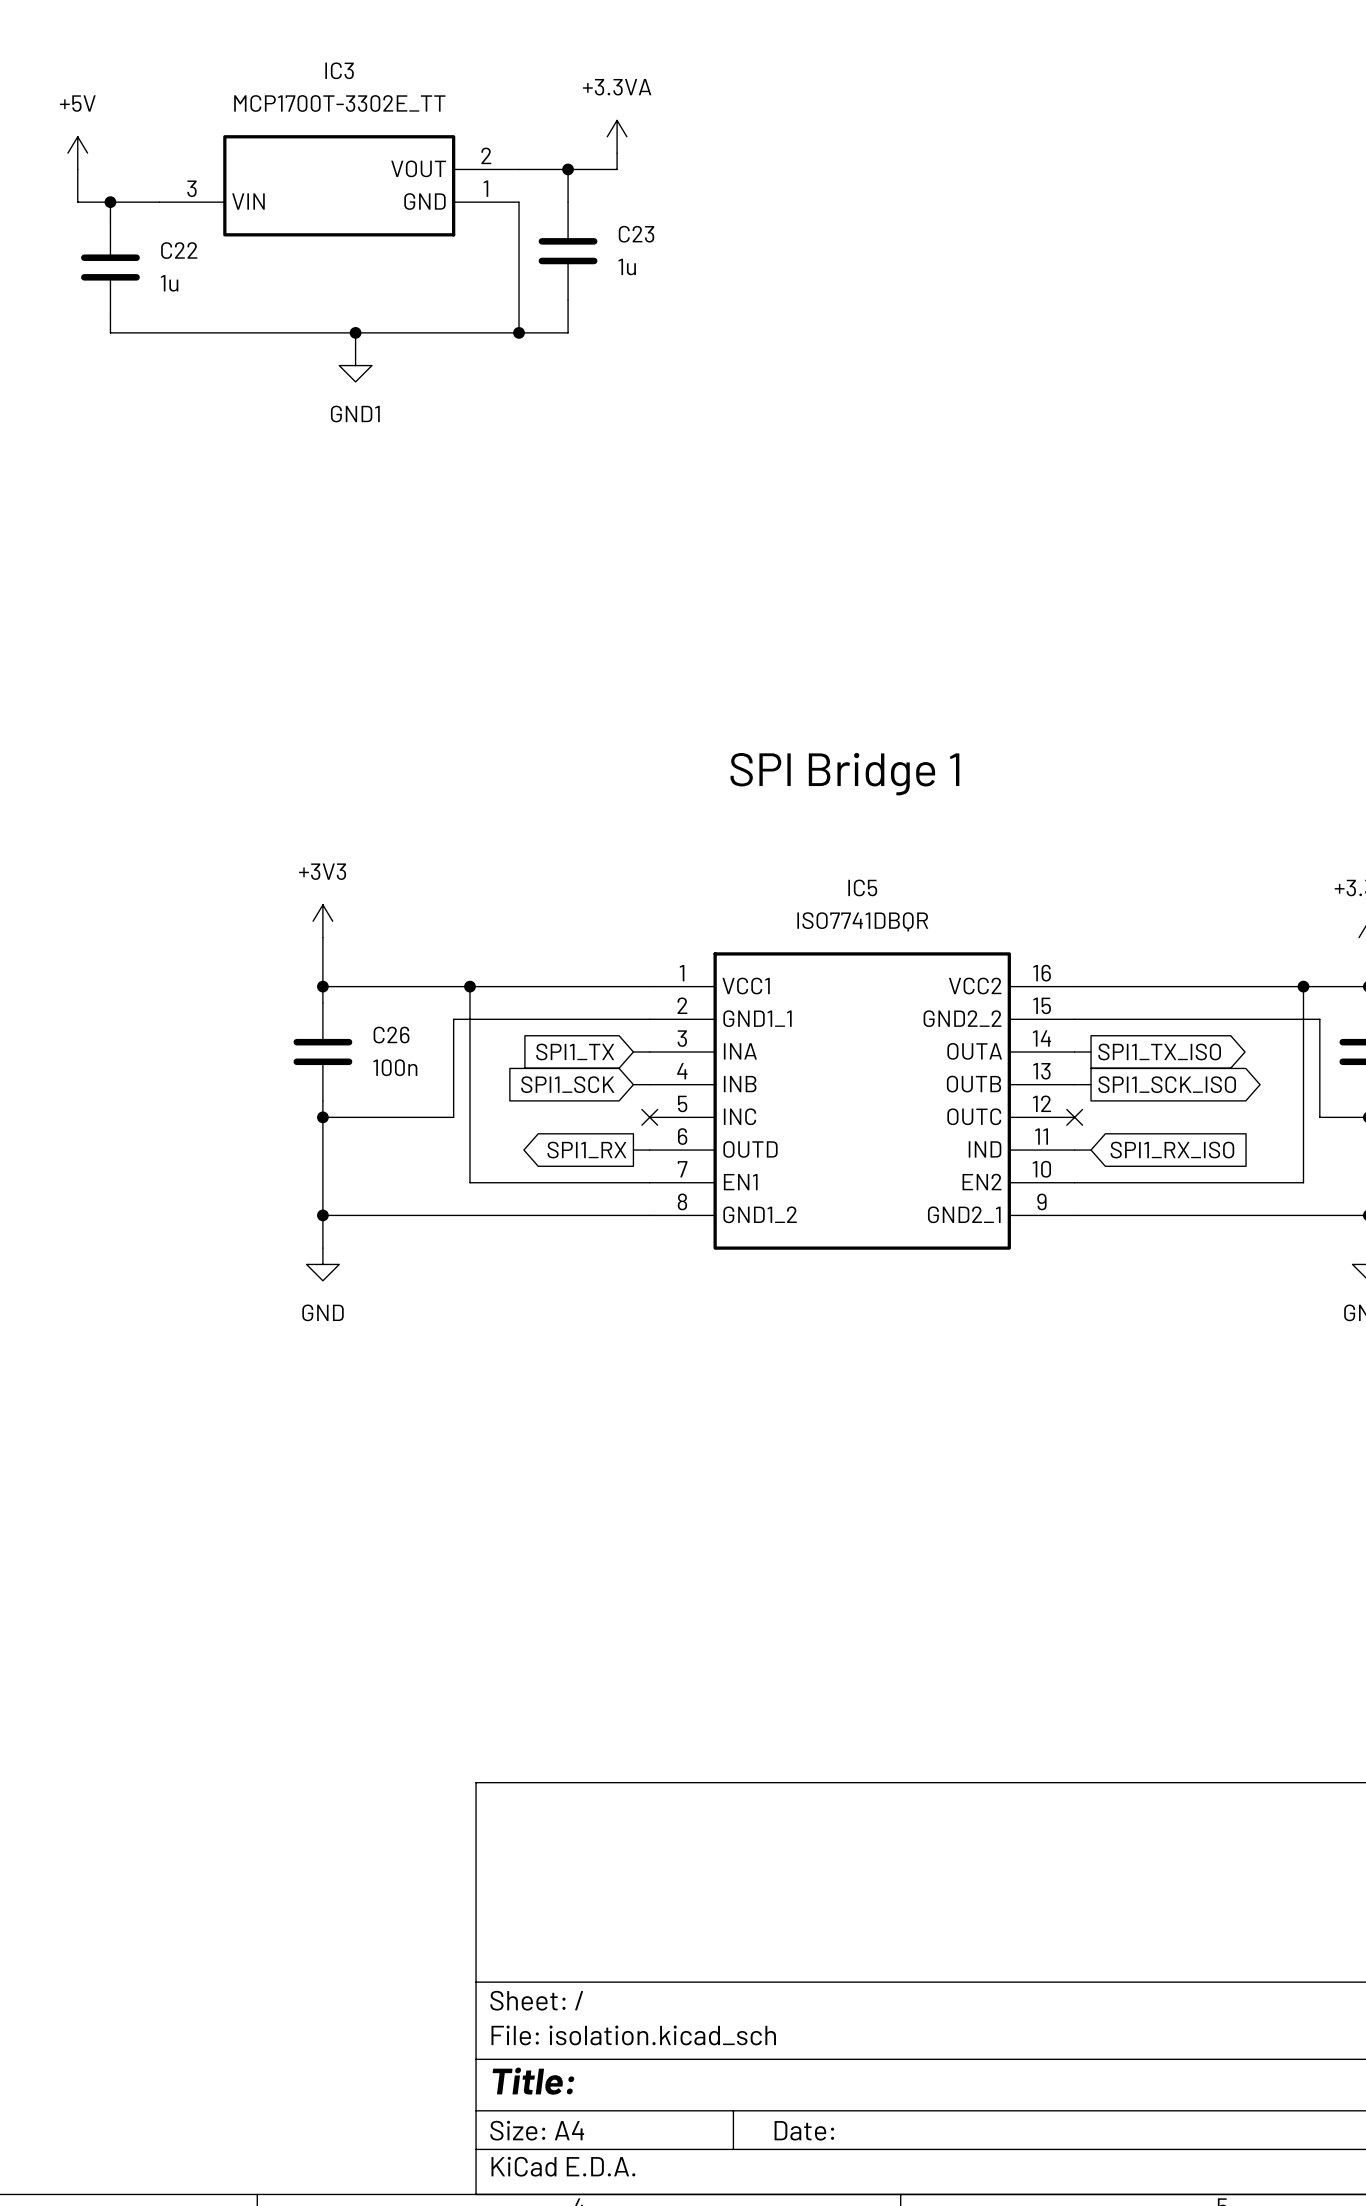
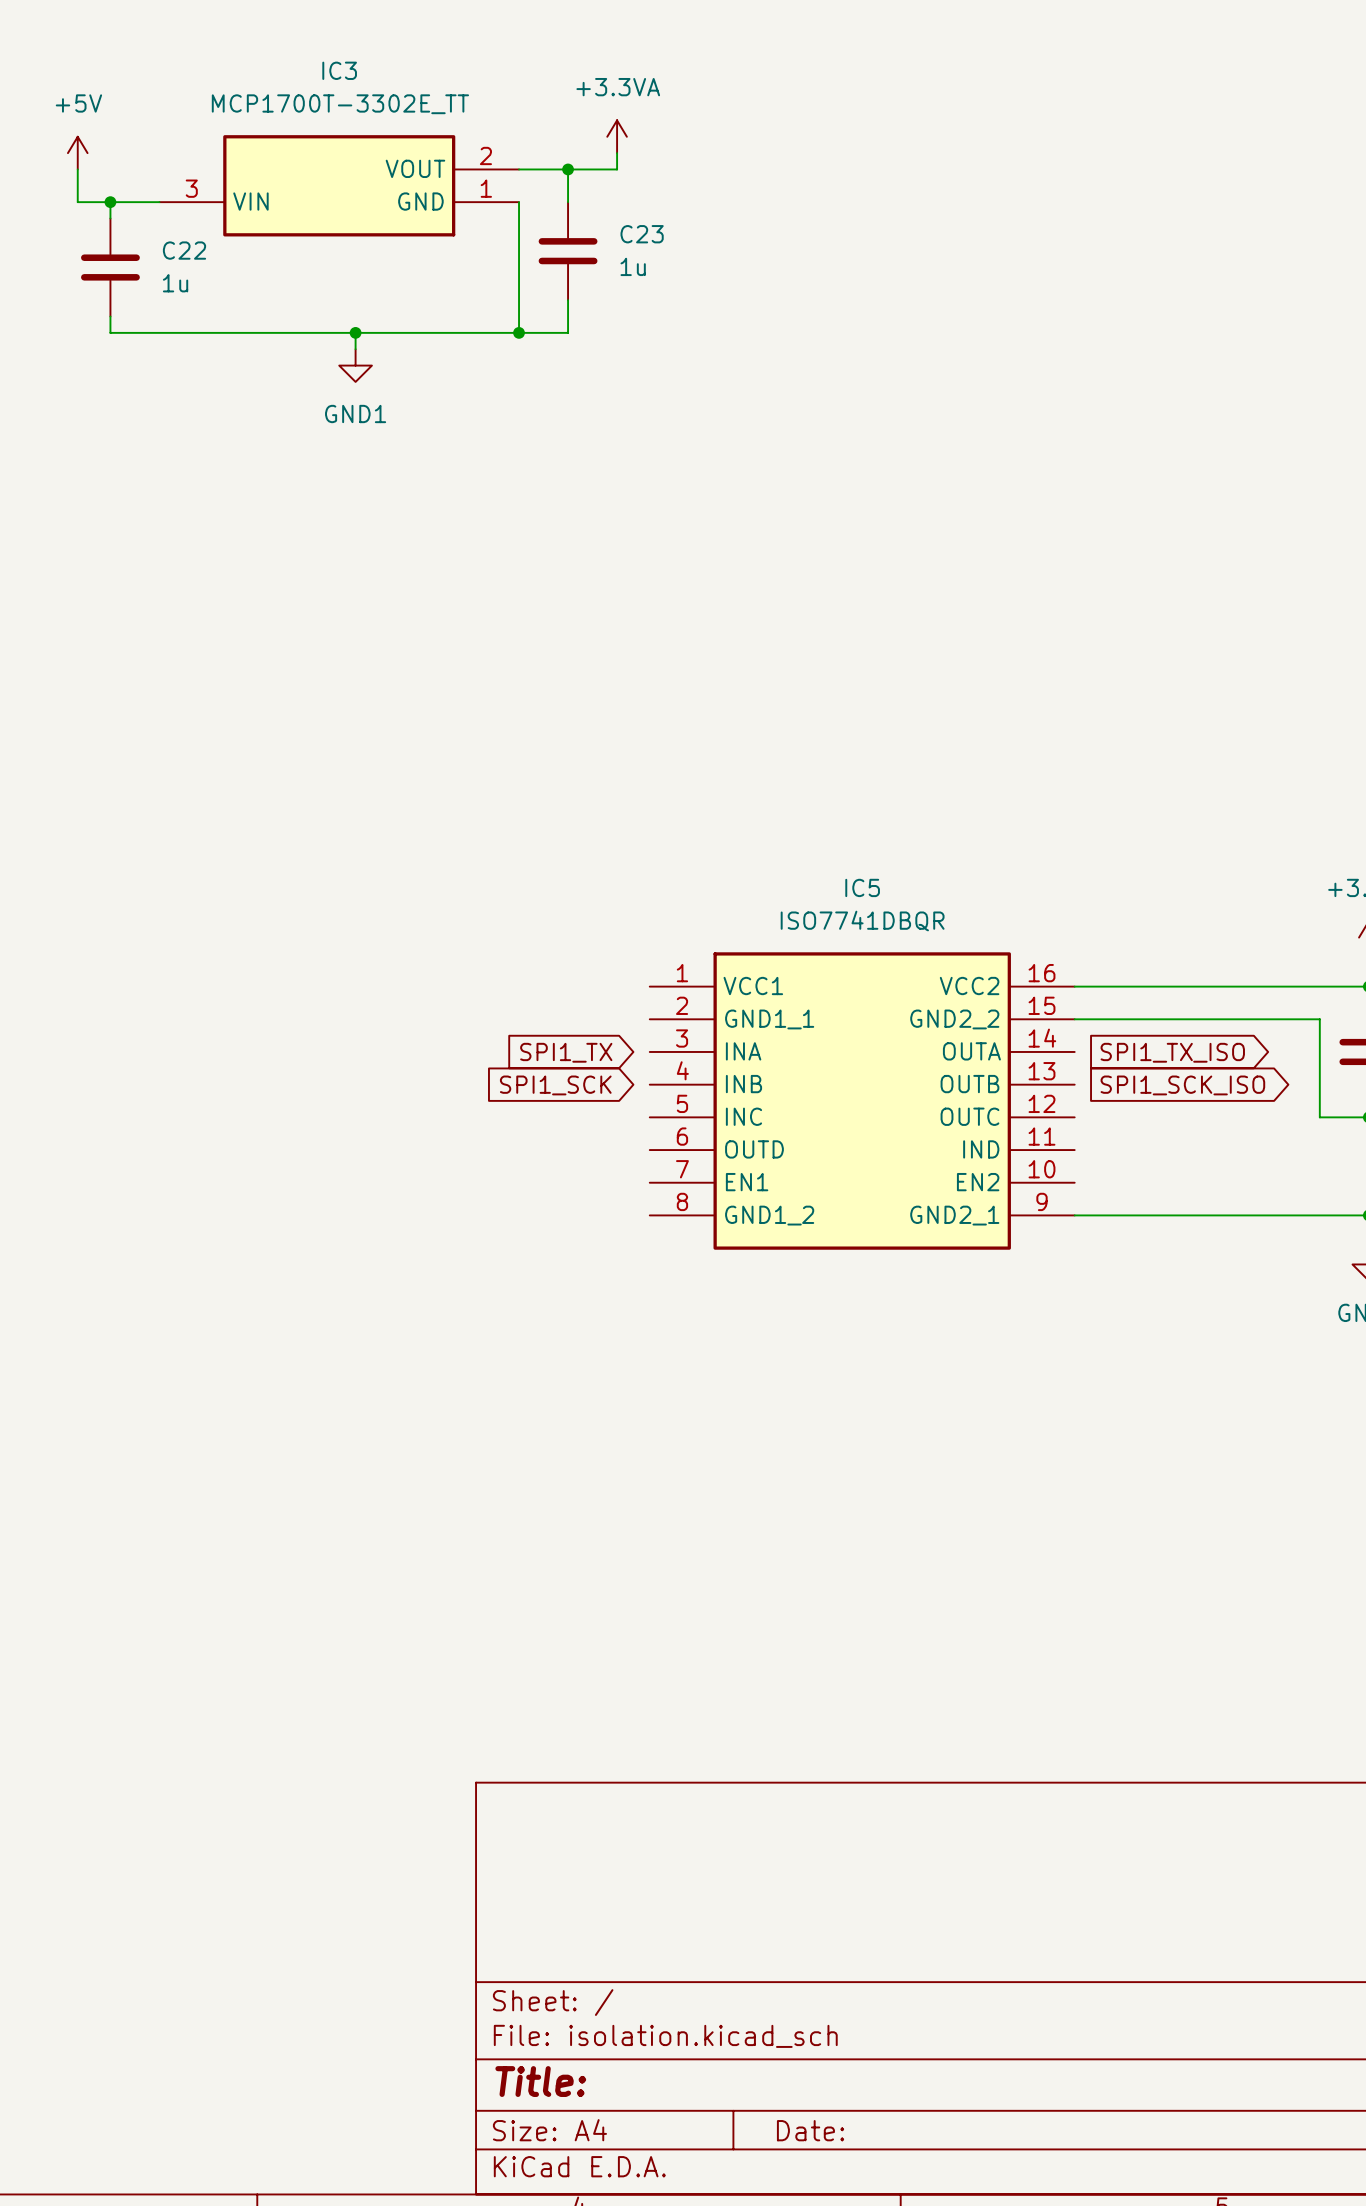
text: SPI Bridge 1 (844, 774) -> none
power symbol: +3V3 (322, 921) -> none
wire: (322, 937) (322, 1002) -> none
wire: (322, 986) (649, 986) -> none
junction: (322, 986) -> none
wire: (469, 986) (469, 1182) (649, 1182) -> none
junction: (469, 986) -> none
wire: (1303, 986) (1303, 1182) (1074, 1182) -> none
junction: (1303, 986) -> none
wire: (649, 1019) (453, 1019) (453, 1117) (322, 1117) -> none
C26: 100n (322, 1051) -> none
wire: (633, 1051) (649, 1051) -> none
wire: (1074, 1051) (1091, 1051) -> none
wire: (633, 1084) (649, 1084) -> none
wire: (1074, 1084) (1091, 1084) -> none
wire: (322, 1101) (322, 1248) -> none
junction: (322, 1117) -> none
no-connect mark: (649, 1117) -> none
no-connect mark: (1074, 1117) -> none
global label: SPI1_RX (586, 1150) -> none
wire: (633, 1150) (649, 1150) -> none
wire: (1074, 1150) (1091, 1150) -> none
global label: SPI1_RX_ISO (1172, 1150) -> none
wire: (322, 1215) (649, 1215) -> none
junction: (322, 1215) -> none
power symbol: GND (322, 1264) -> none

